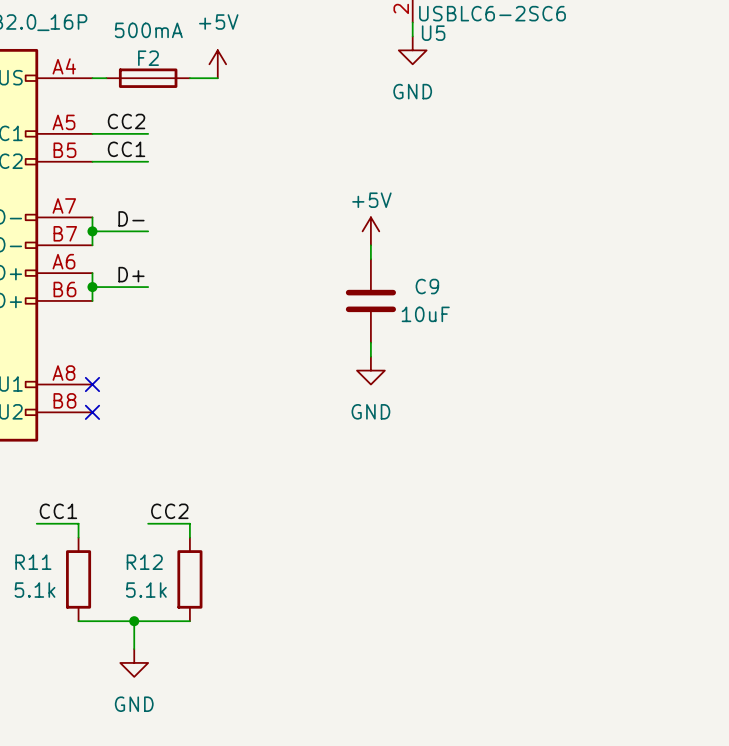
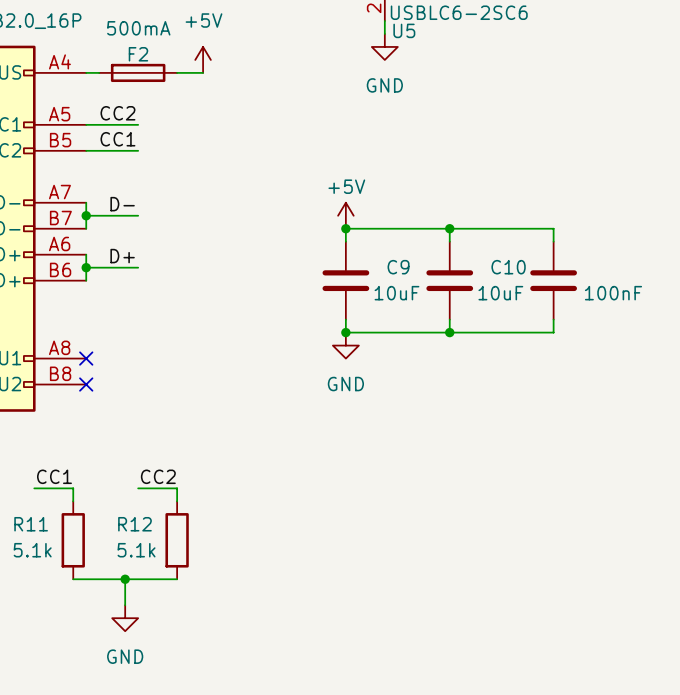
wire: none -> (345, 228) (553, 228) (553, 241)
junction: none -> (345, 228)
wire: none -> (449, 228) (449, 241)
junction: none -> (449, 228)
C10: none -> 10uF (449, 280)
part: none -> 100nF (553, 280)
wire: none -> (449, 319) (449, 332)
wire: none -> (553, 319) (553, 332) (345, 332)
junction: none -> (345, 332)
junction: none -> (449, 332)

